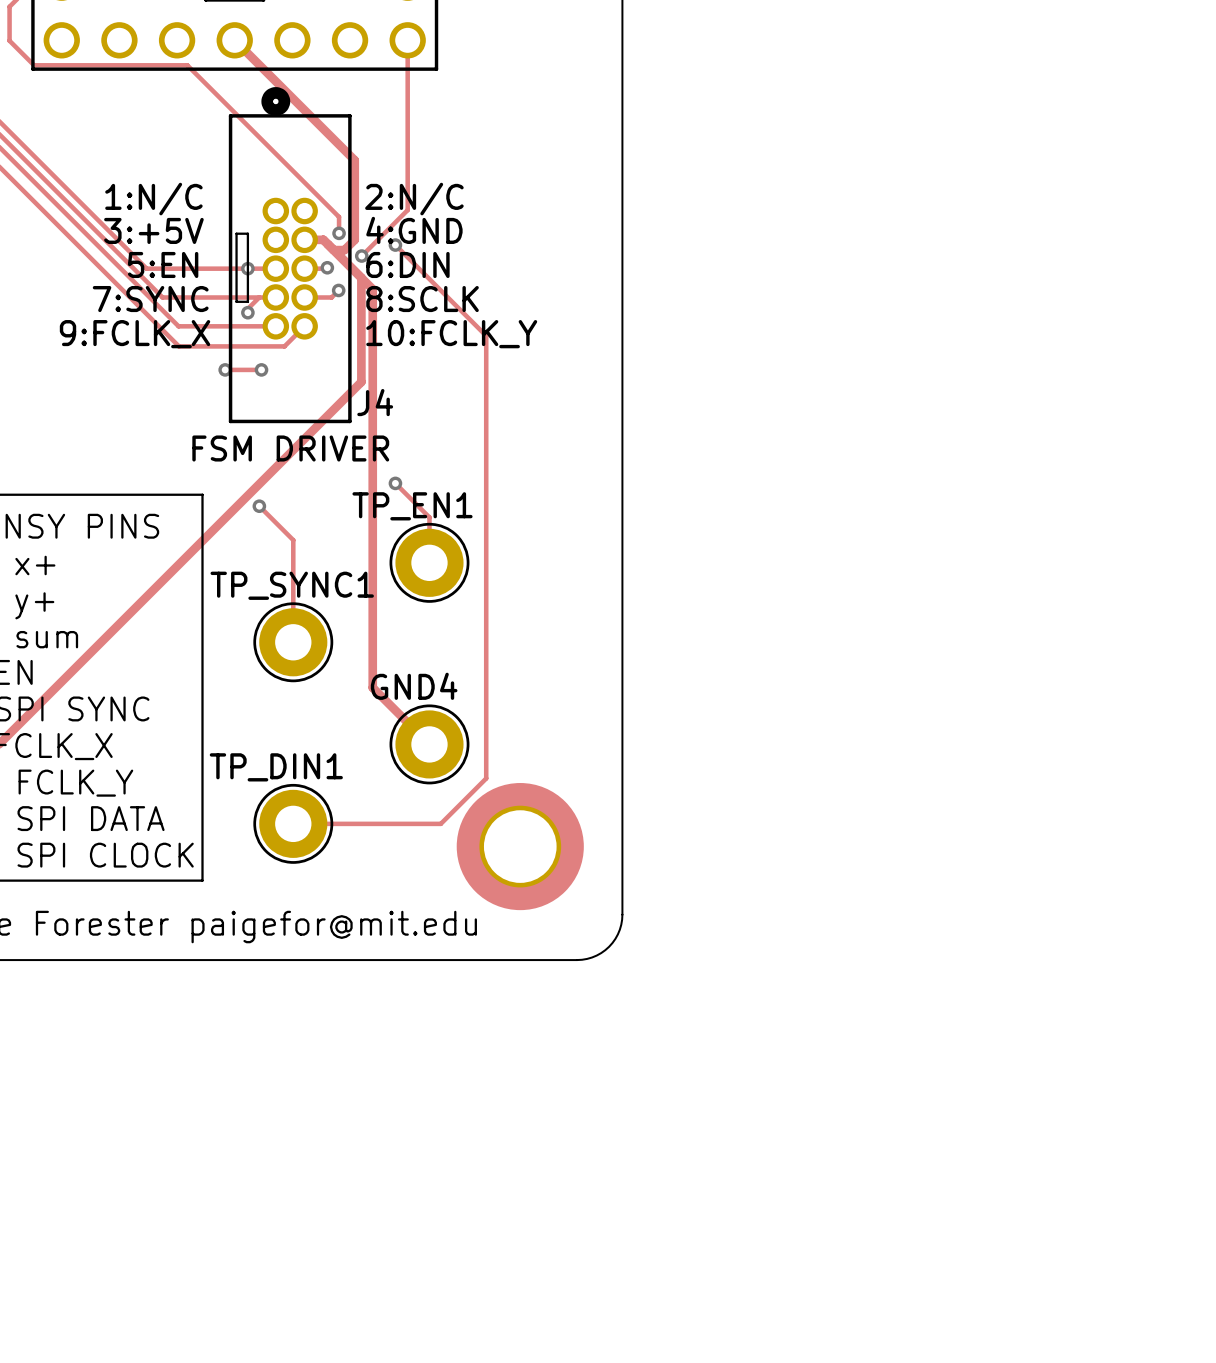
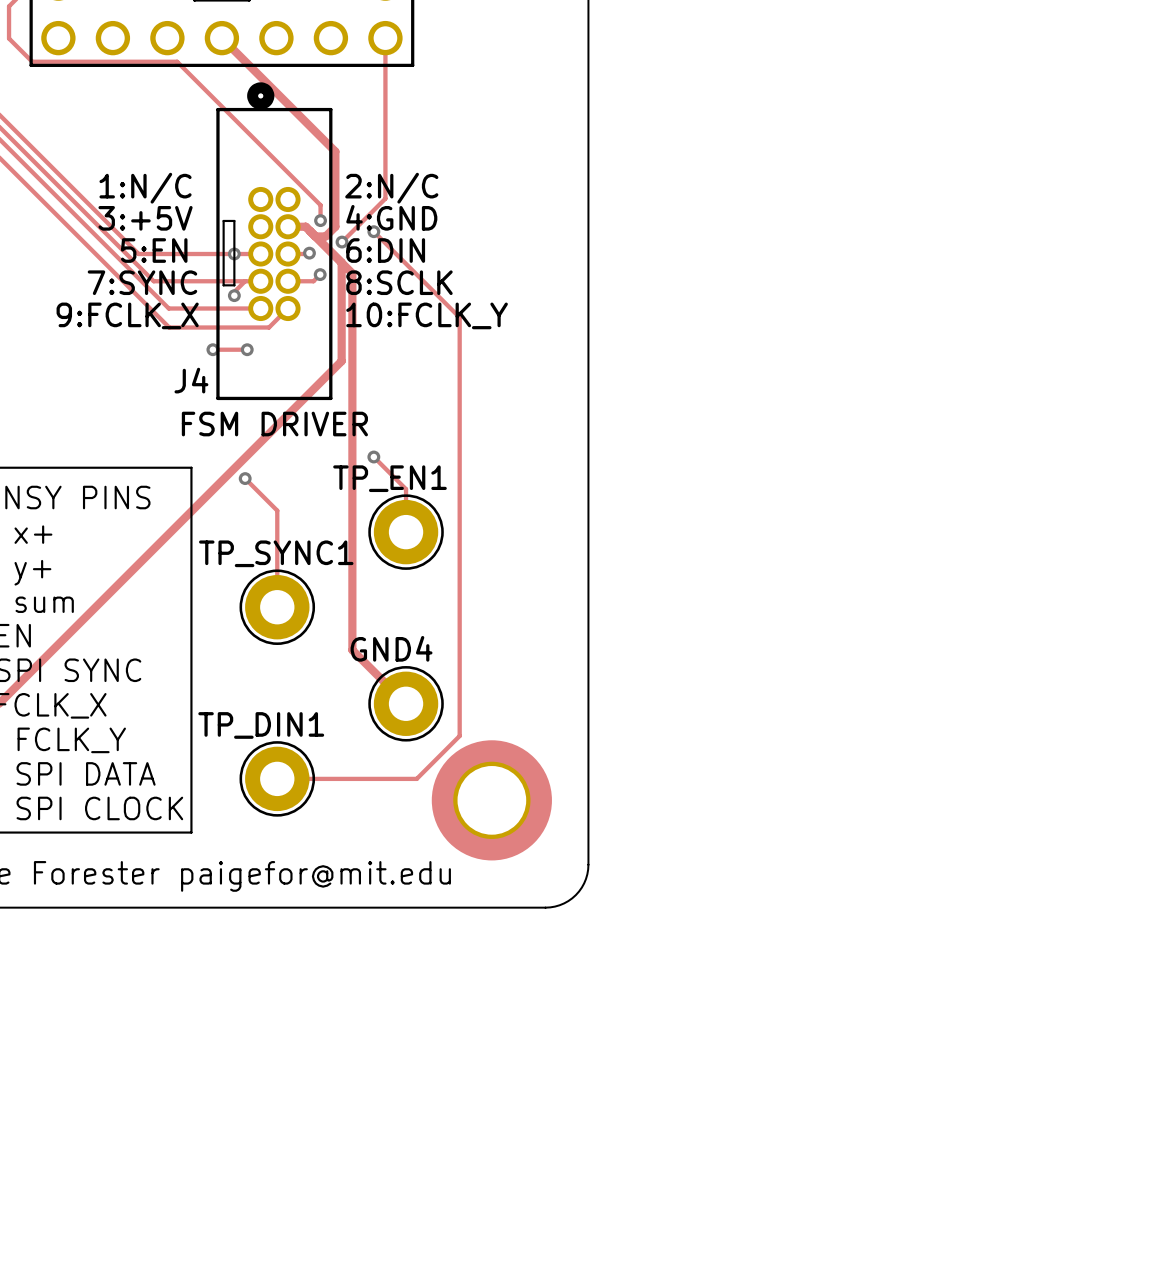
J4 name position: J4 (375, 402) -> J4 (191, 380)

